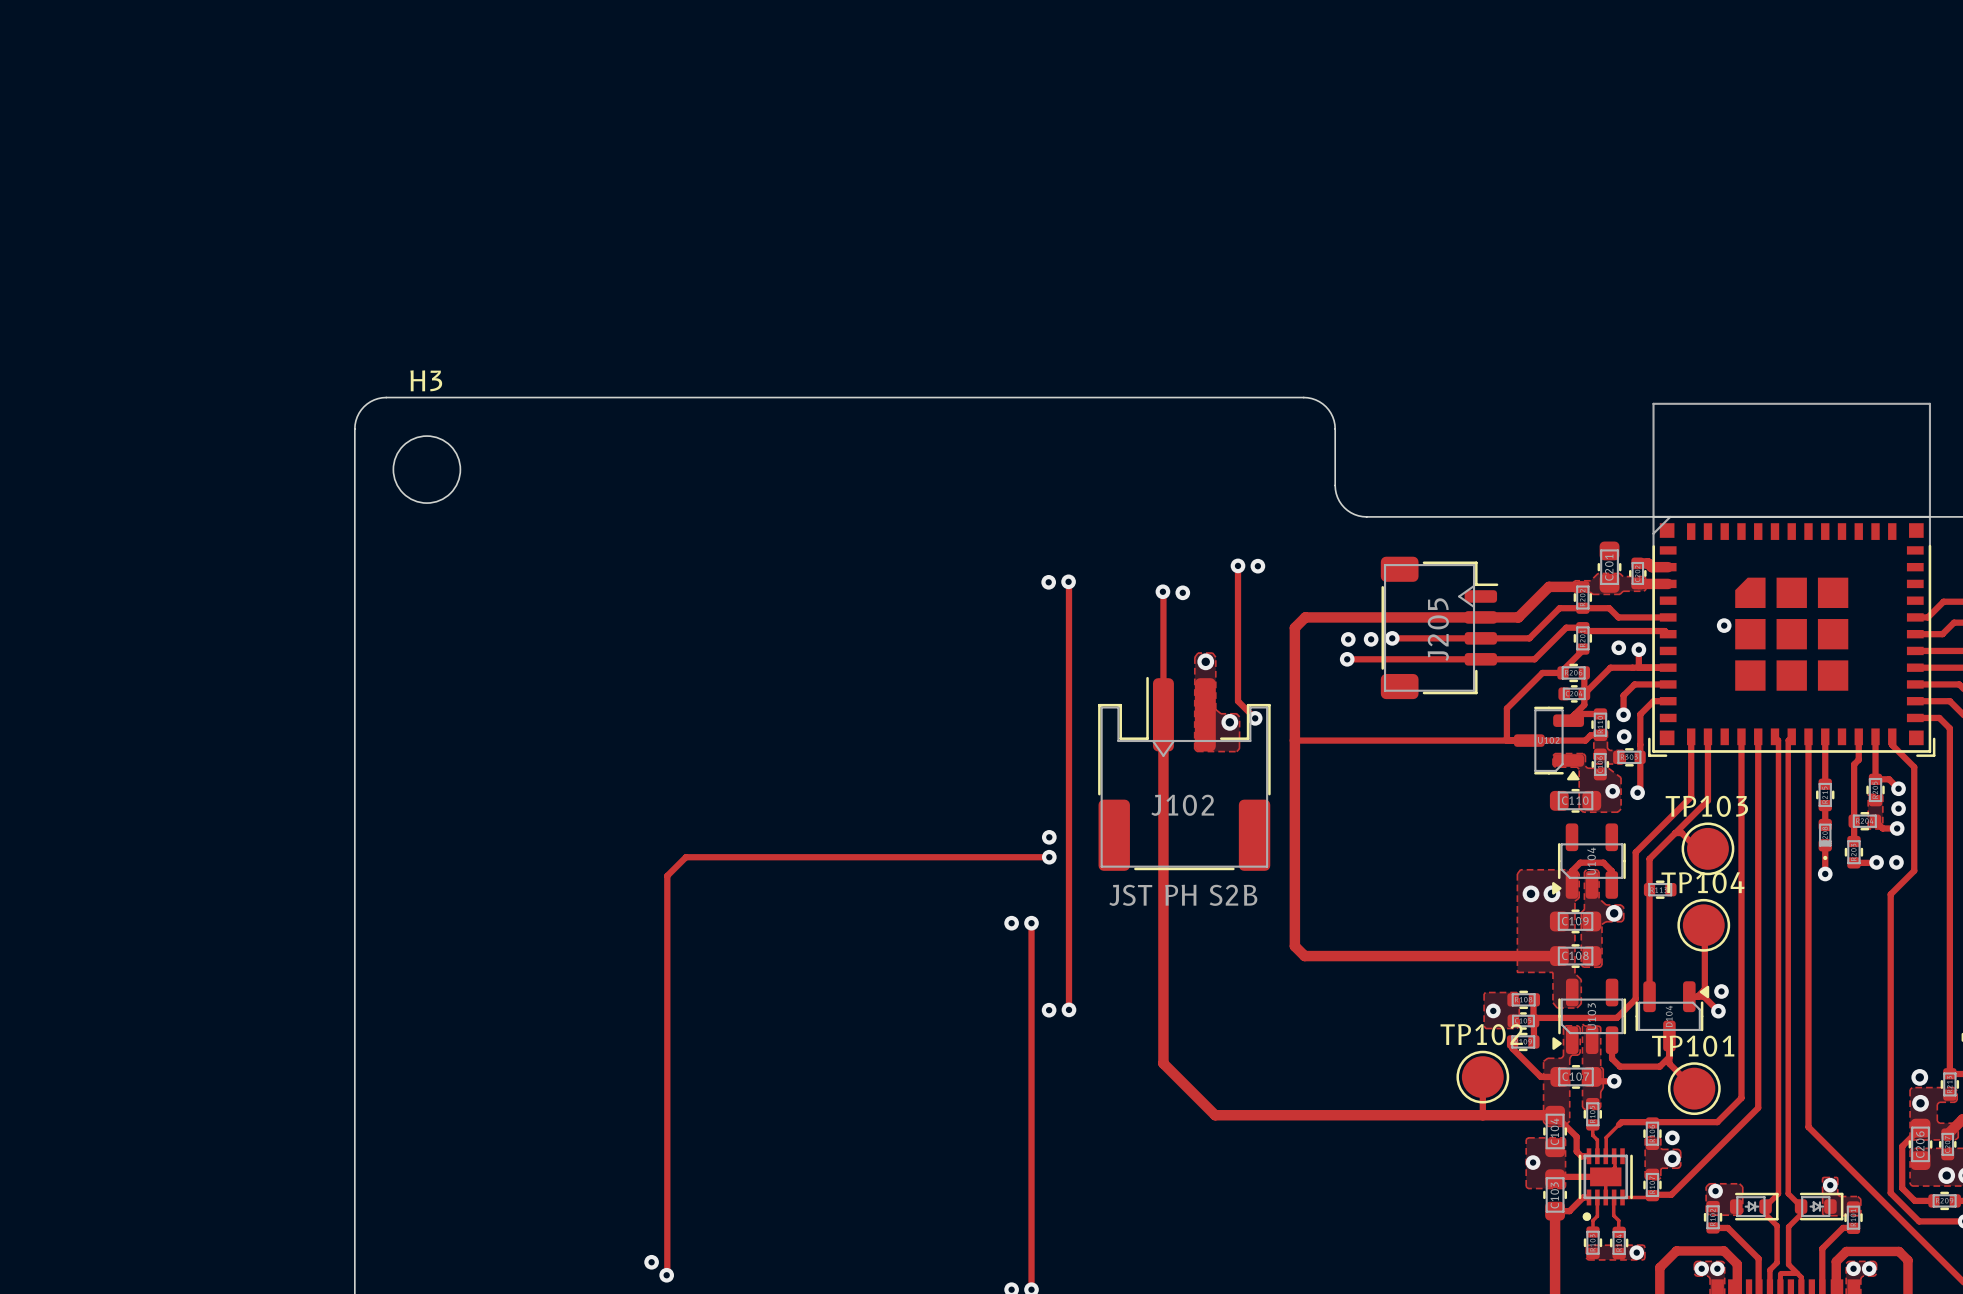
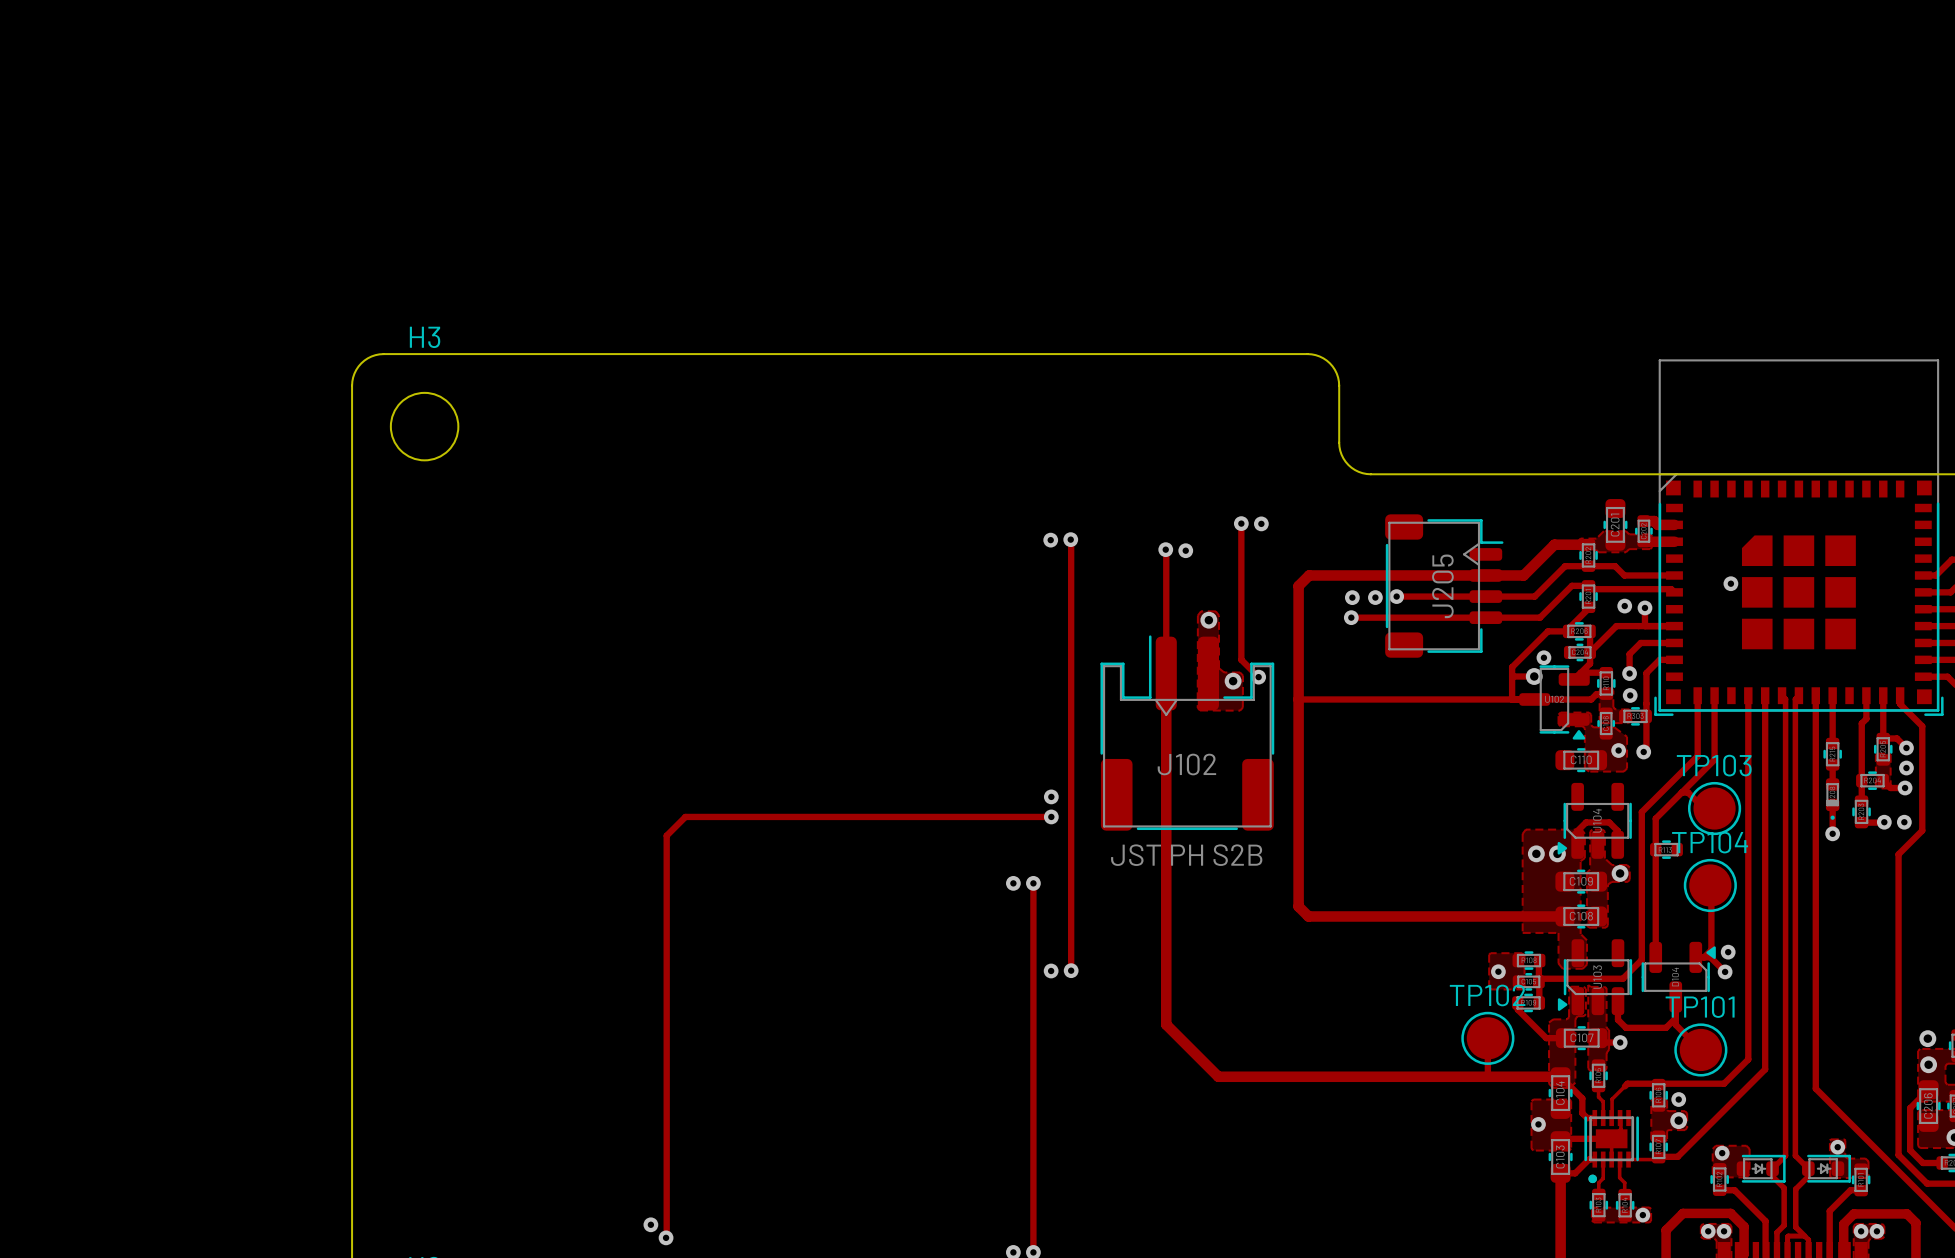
via: none -> (1543, 657)
track: none -> (1512, 676) (1534, 676)
via: none -> (1534, 676)

